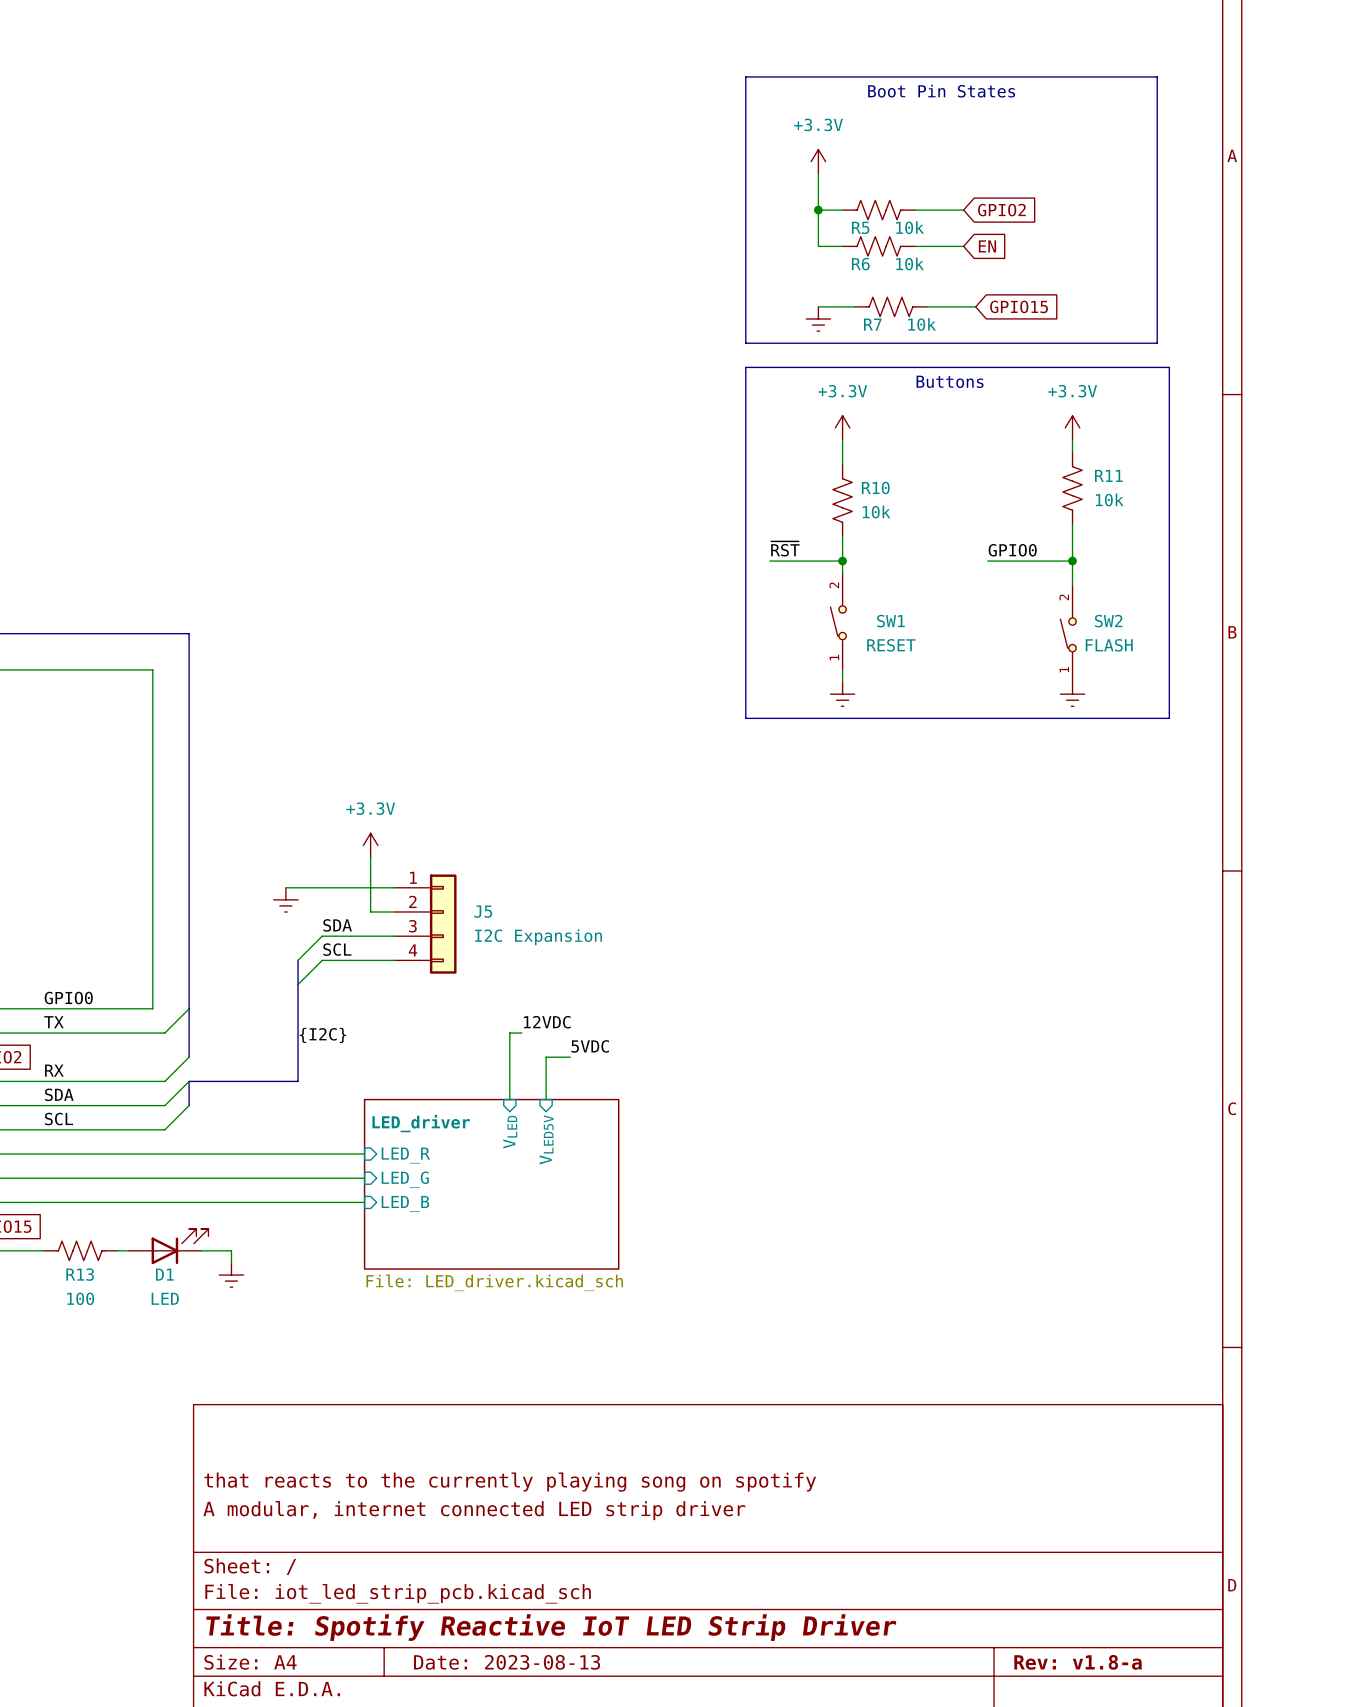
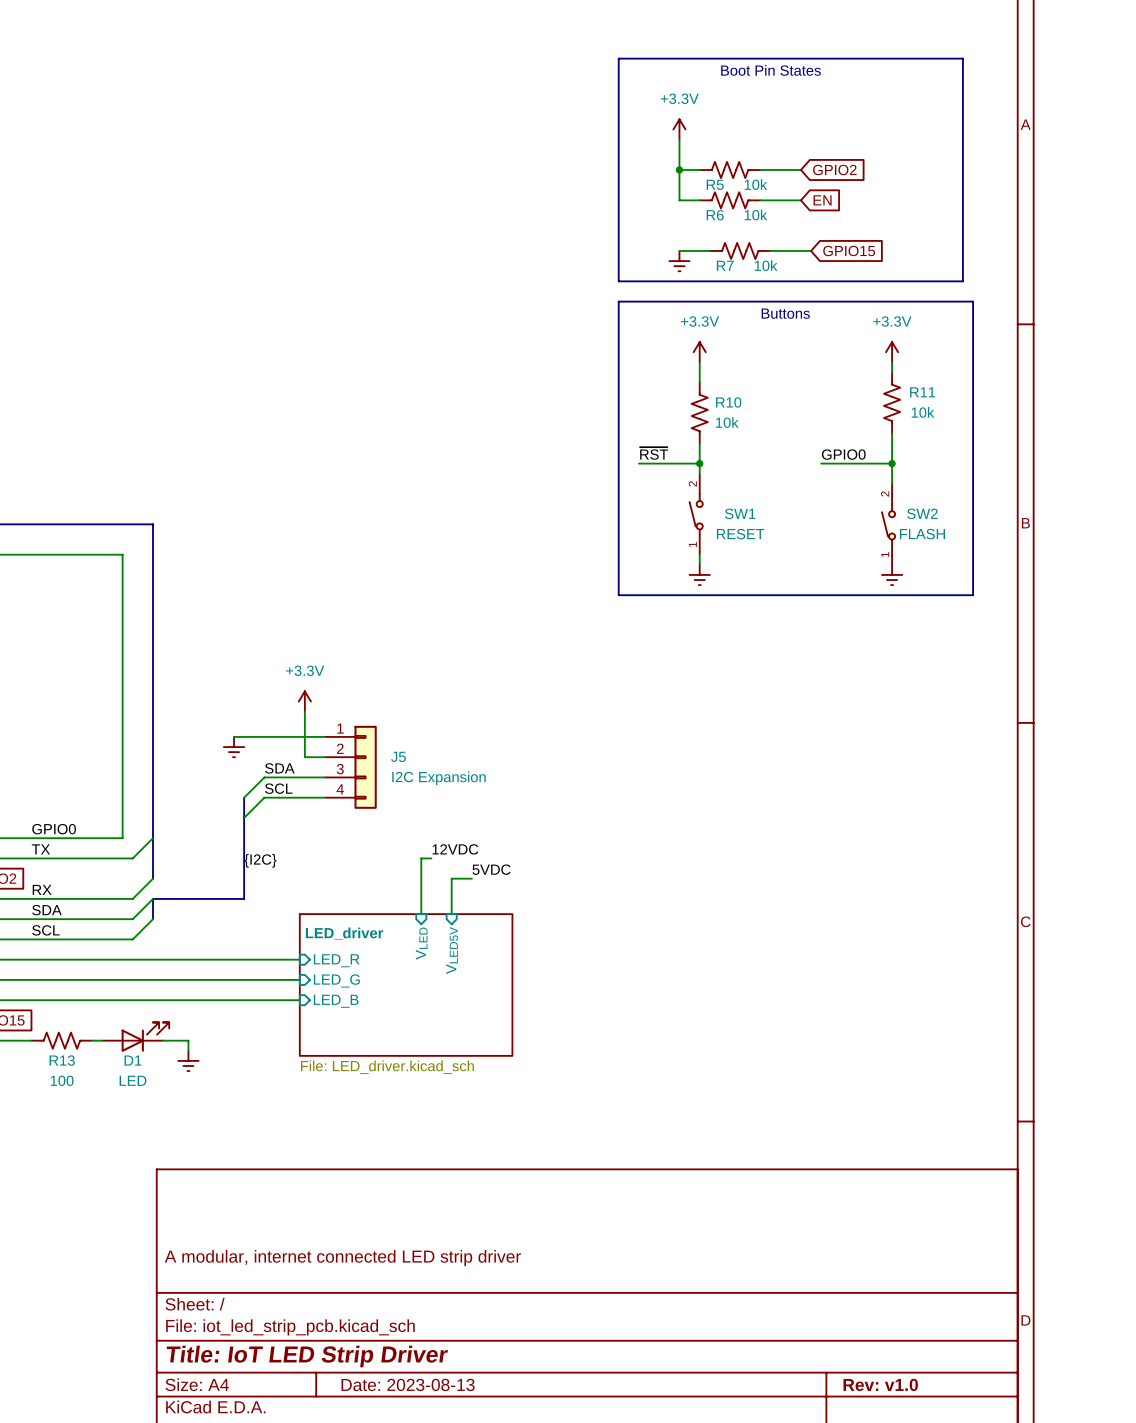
title block: that reacts to the currently playing song on spotify (510, 1482) -> none
title block: Title: Spotify Reactive IoT LED Strip Driver (551, 1627) -> Title: IoT LED Strip Driver (307, 1356)
title block: Rev: v1.8-a (1078, 1662) -> Rev: v1.0 (880, 1384)

